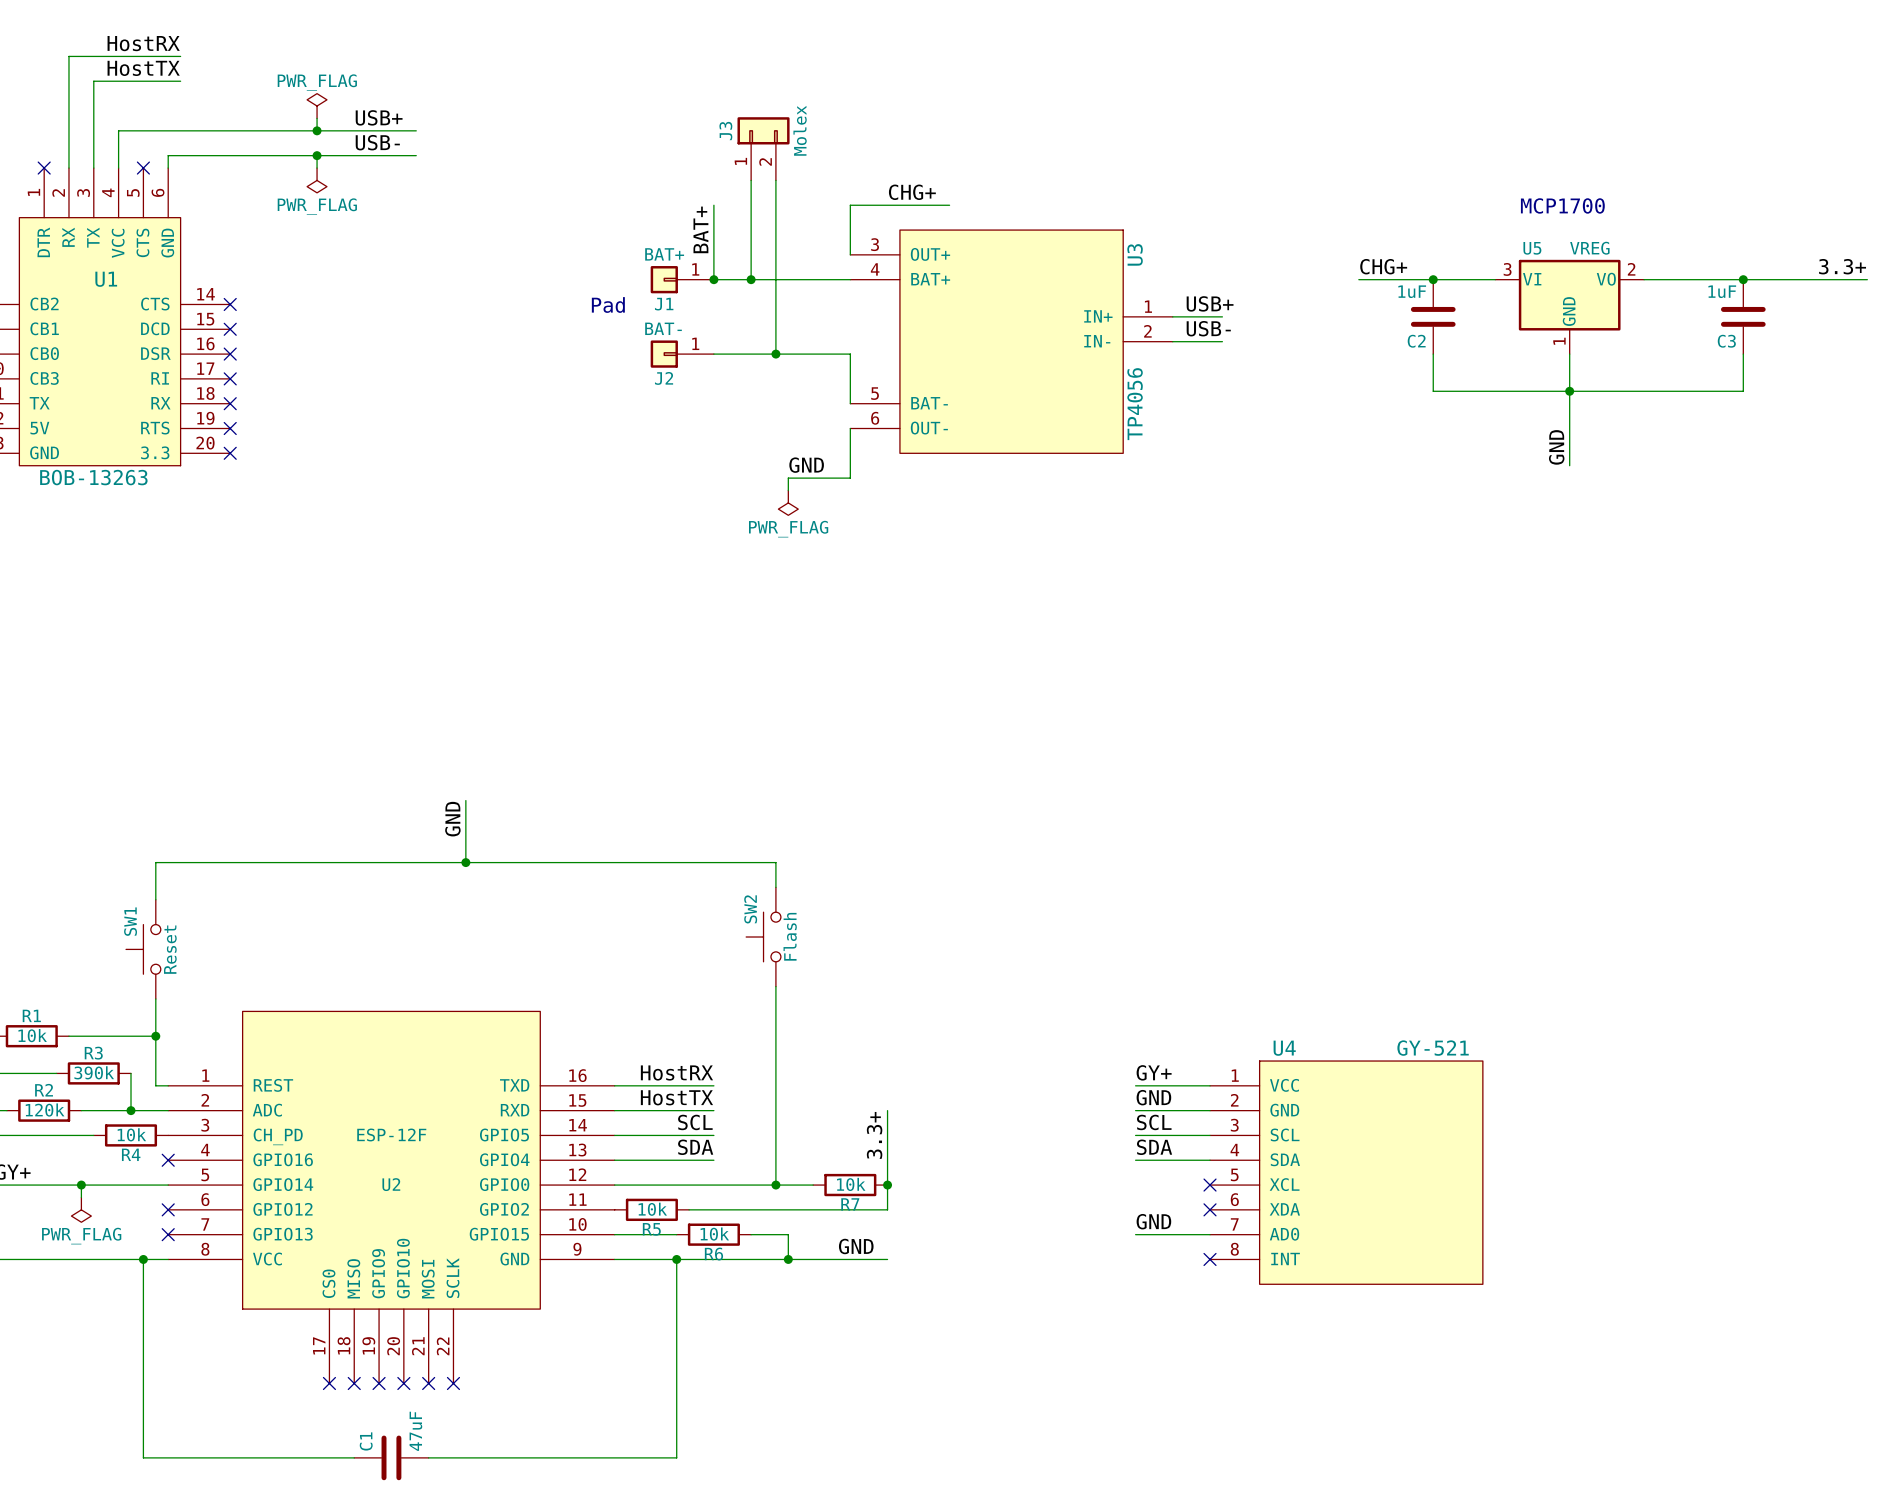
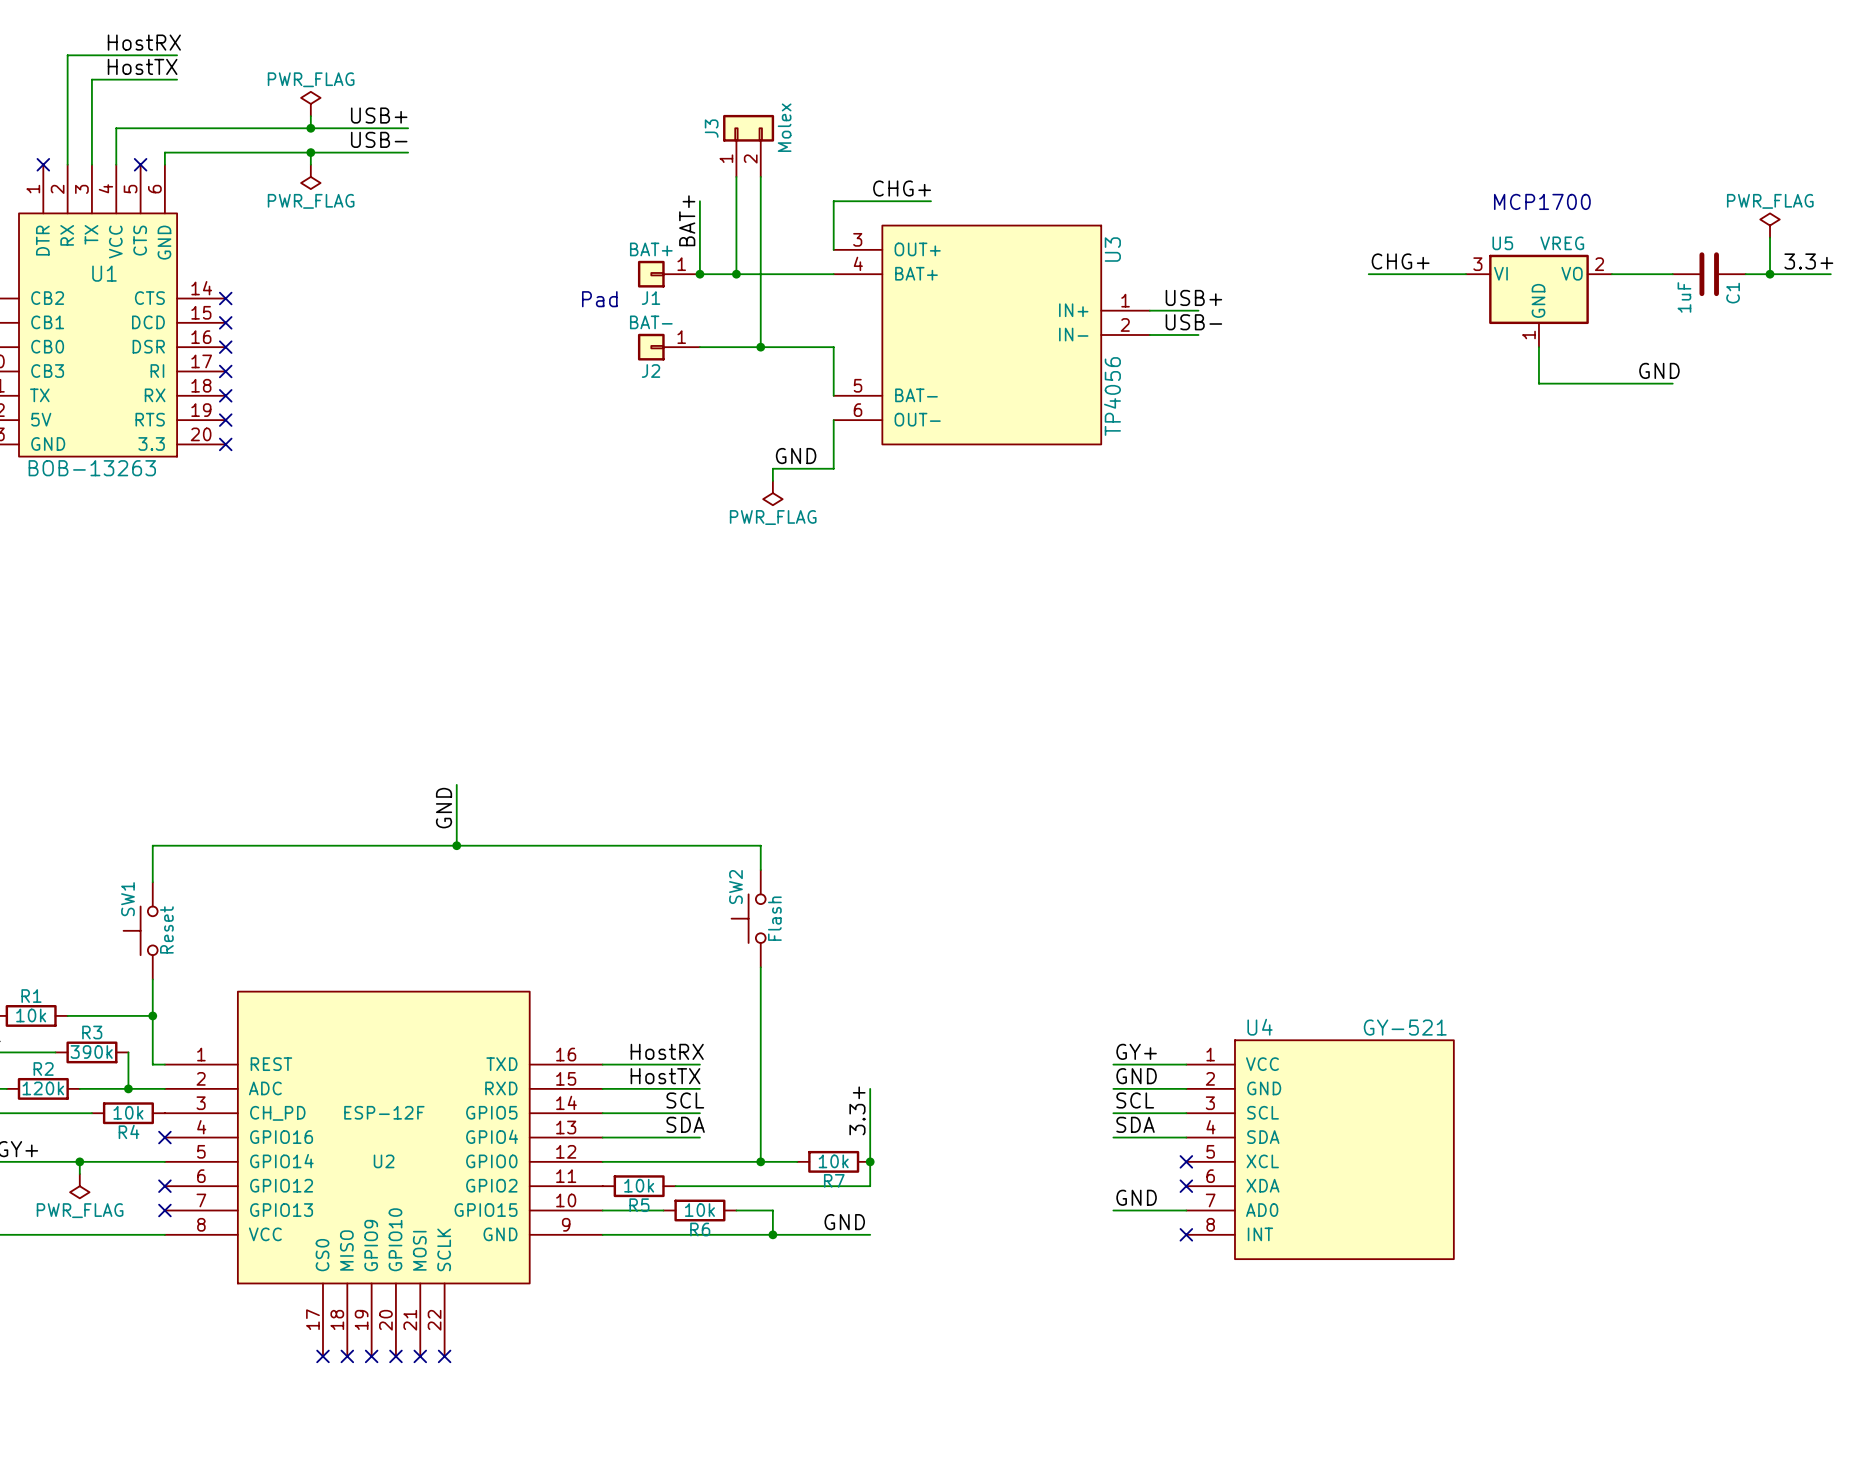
power symbol: none -> PWR_FLAG (1770, 225)
wire: none -> (1770, 237) (1770, 274)
label position: CHG+ (1383, 266) -> CHG+ (1400, 261)
wire: (1358, 279) (1396, 279) -> none
junction: (1433, 279) -> none
junction: (1743, 279) -> none
junction: none -> (1770, 274)
C2: 1uF (1433, 316) -> none
C3: 1uF (1743, 316) -> none
wire: (1433, 354) (1433, 391) (1569, 391) (1569, 465) -> none
wire: (1743, 354) (1743, 391) (1706, 391) -> none
junction: (1569, 391) -> none
label rotation: 0° (1556, 447) -> 90° clockwise (1659, 370)
label position: GND (1556, 447) -> GND (1659, 370)
wire: (143, 1259) (143, 1457) (354, 1457) -> none
junction: (143, 1259) -> none
wire: (676, 1259) (676, 1457) (428, 1457) -> none
junction: (676, 1259) -> none
C1 value: 47uF (415, 1431) -> 1uF (1684, 297)
C1 name position: C1 (366, 1441) -> C1 (1733, 293)
C1 position: (391, 1457) -> (1709, 274)

